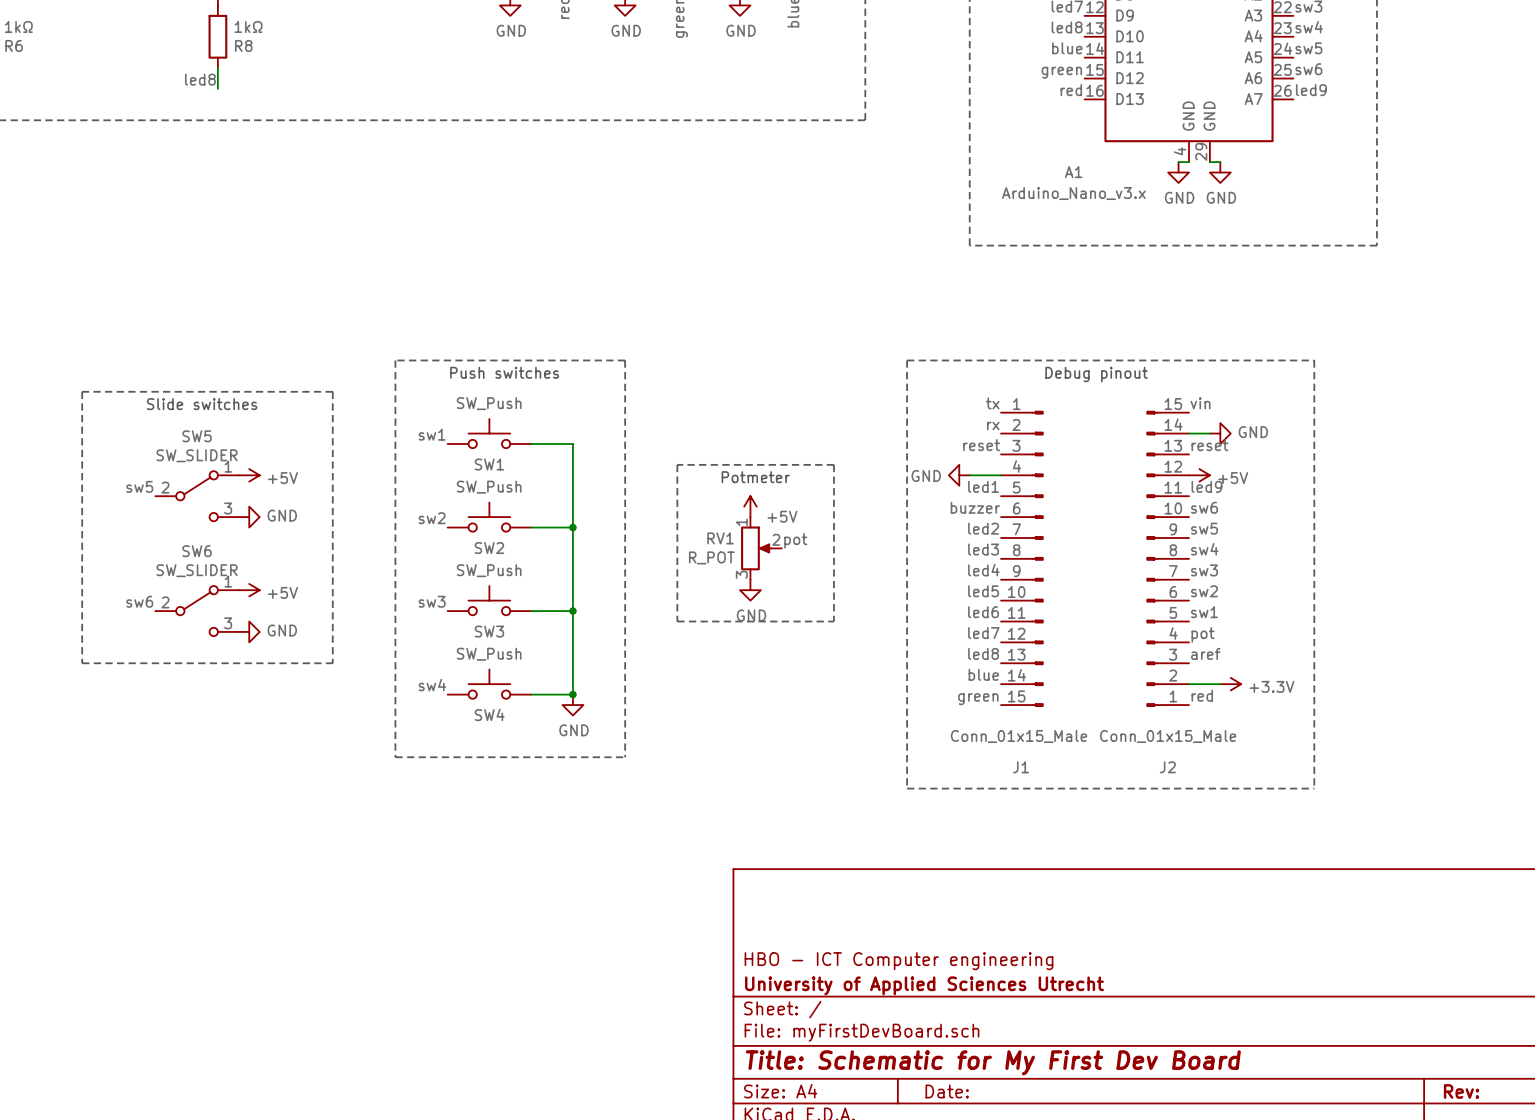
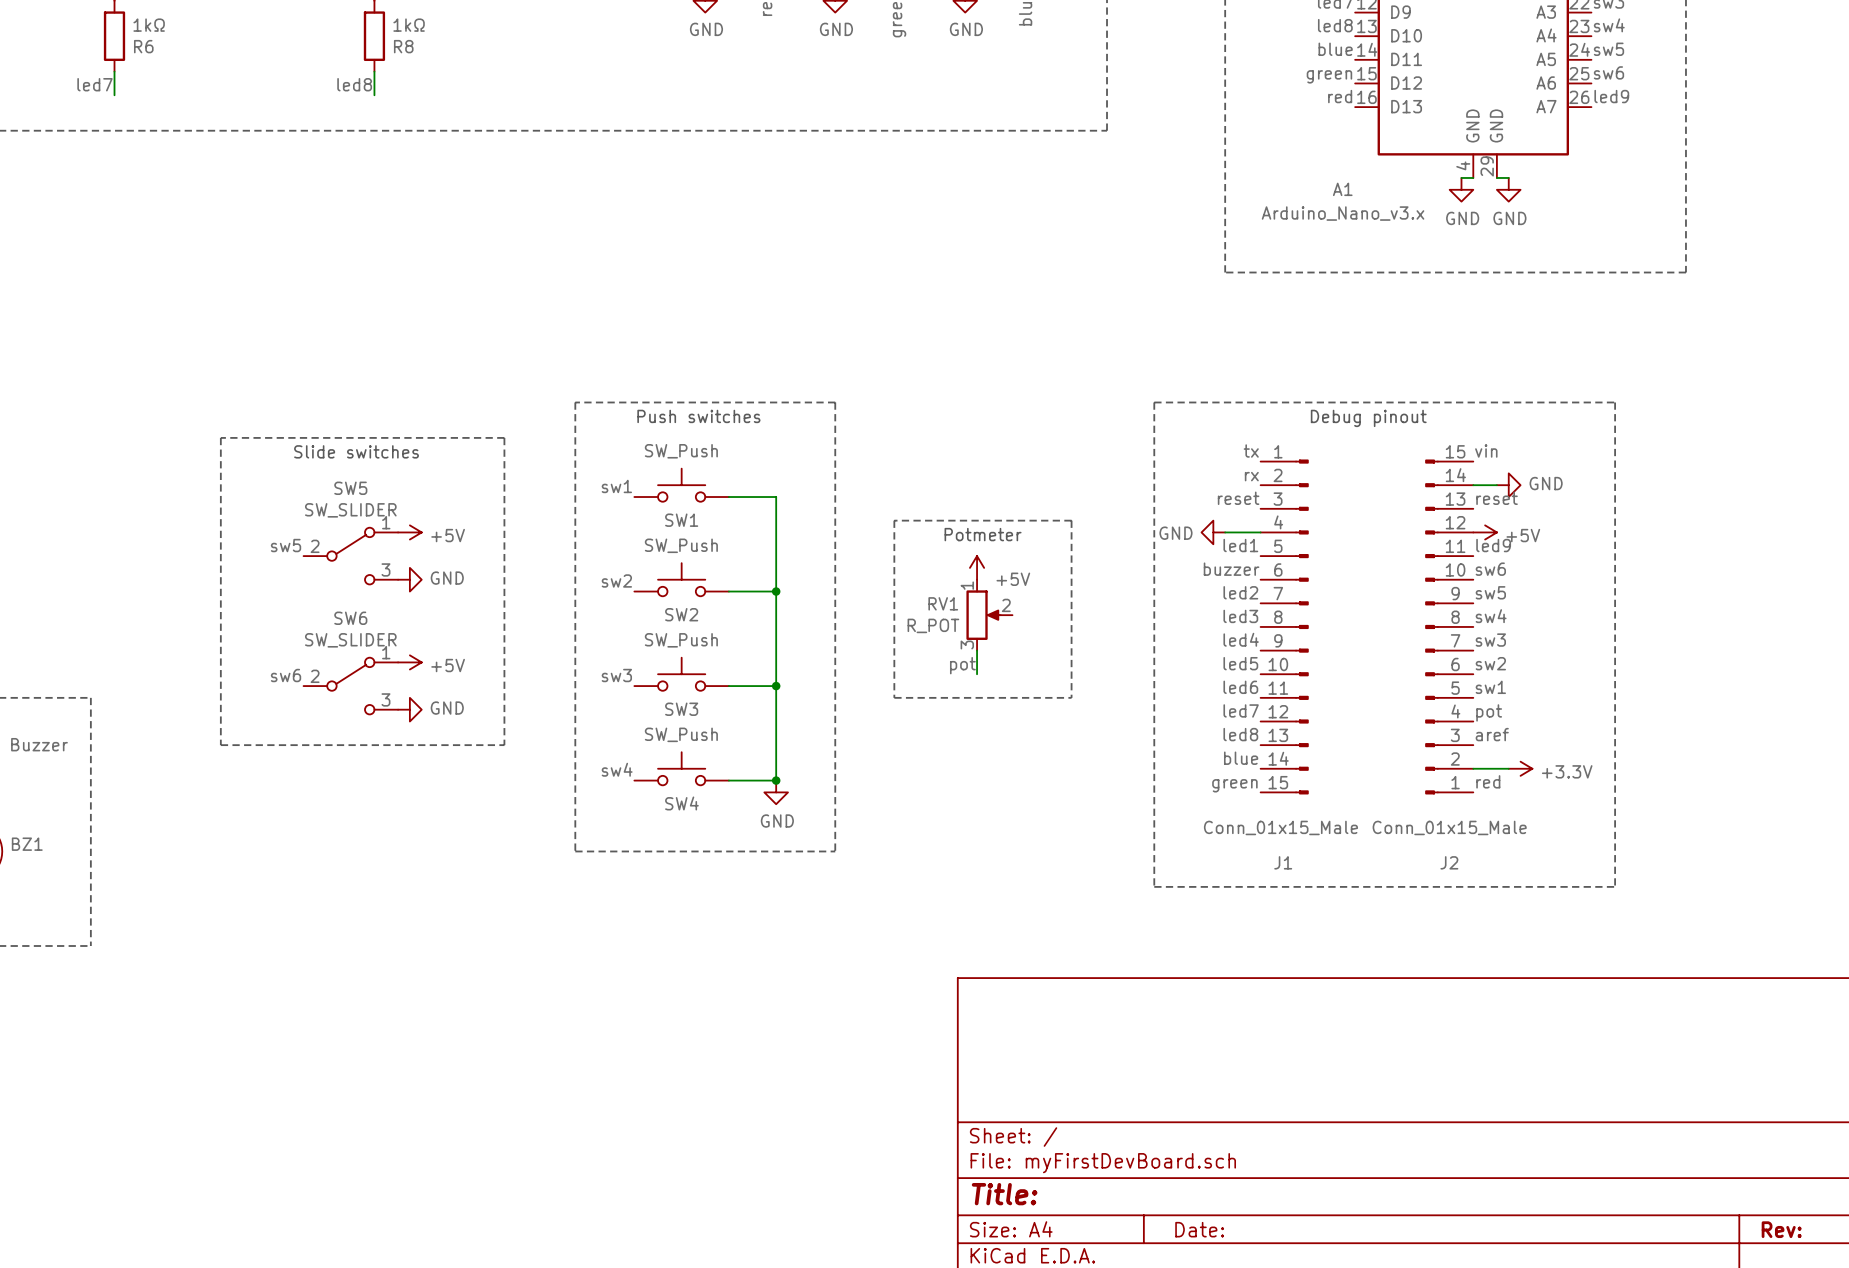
label position: pot (795, 540) -> pot (962, 665)
power symbol: GND (750, 590) -> none
title block: HBO - ICT Computer engineering (899, 961) -> none
title block: University of Applied Sciences Utrecht (924, 985) -> none
title block: Title: Schematic for My First Dev Board (993, 1062) -> Title: (1004, 1194)

